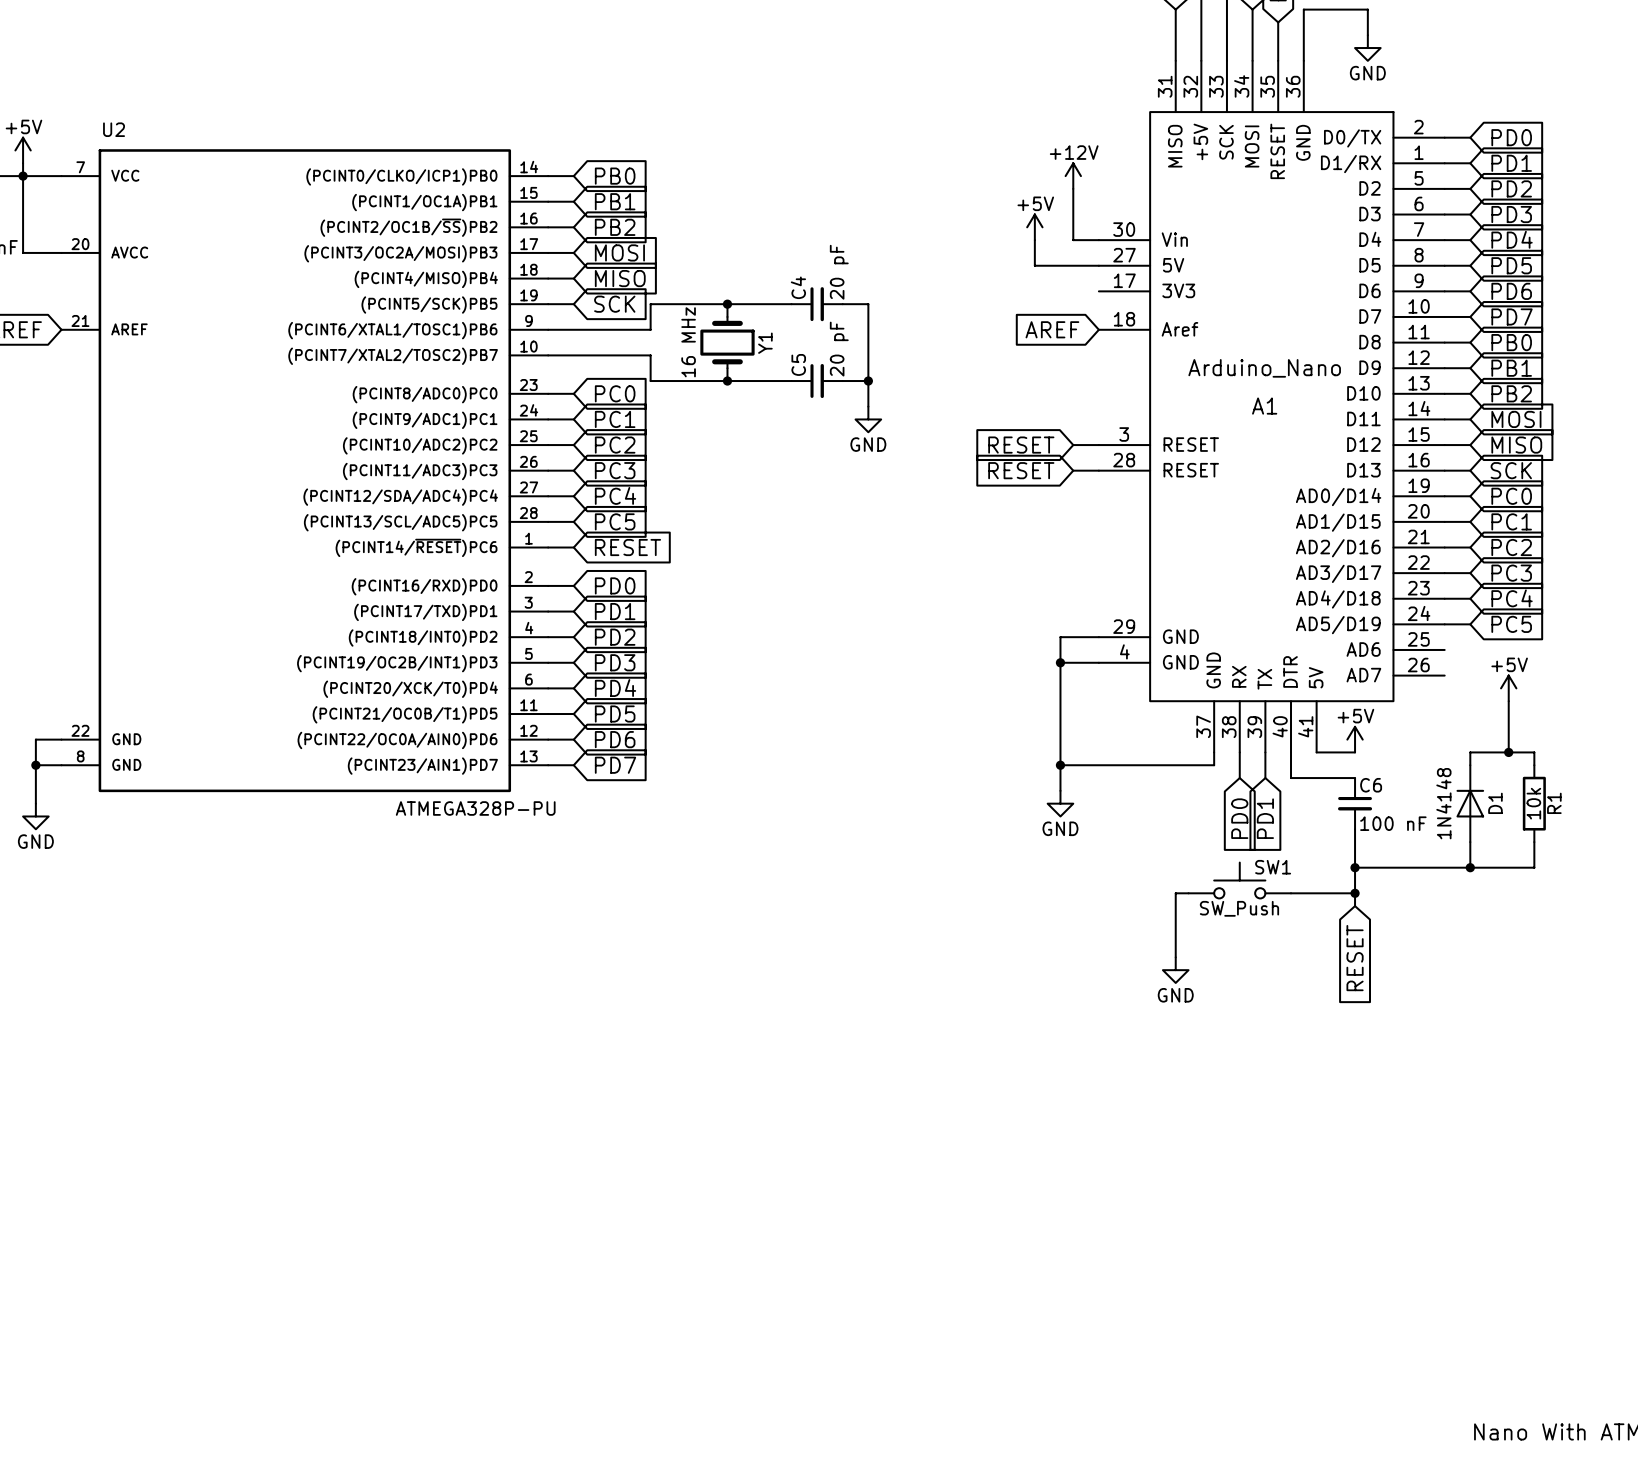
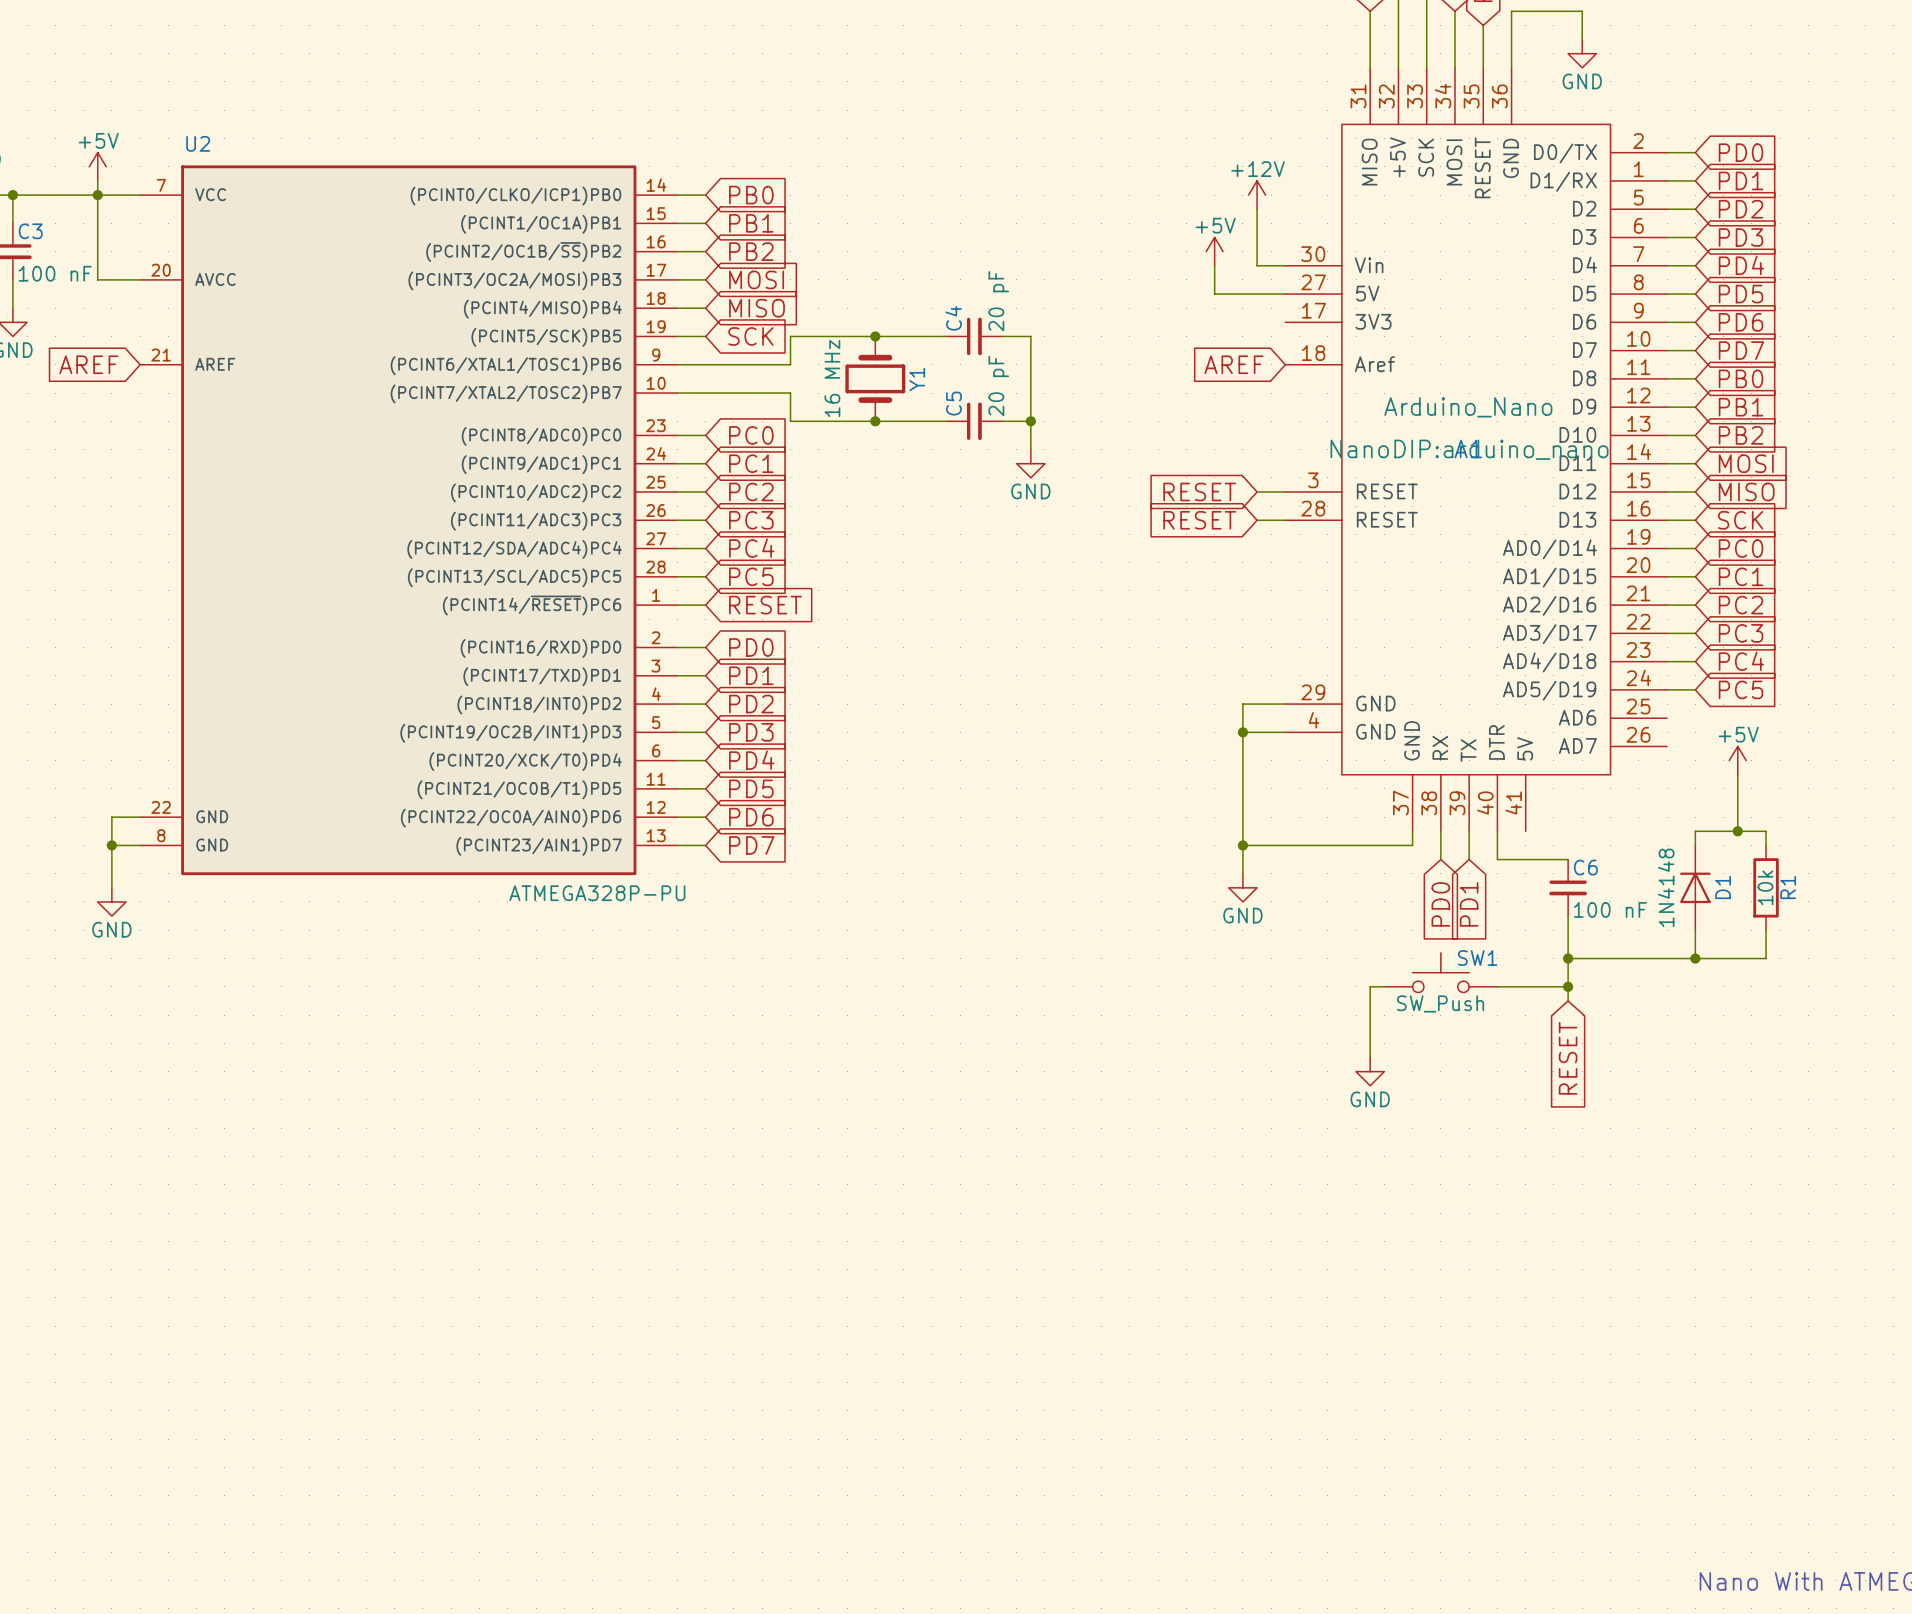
A1 text: none -> NanoDIP:arduino_nano (1469, 449)
power symbol: +5V (1355, 739) -> none
wire: (1316, 752) (1355, 752) -> none

